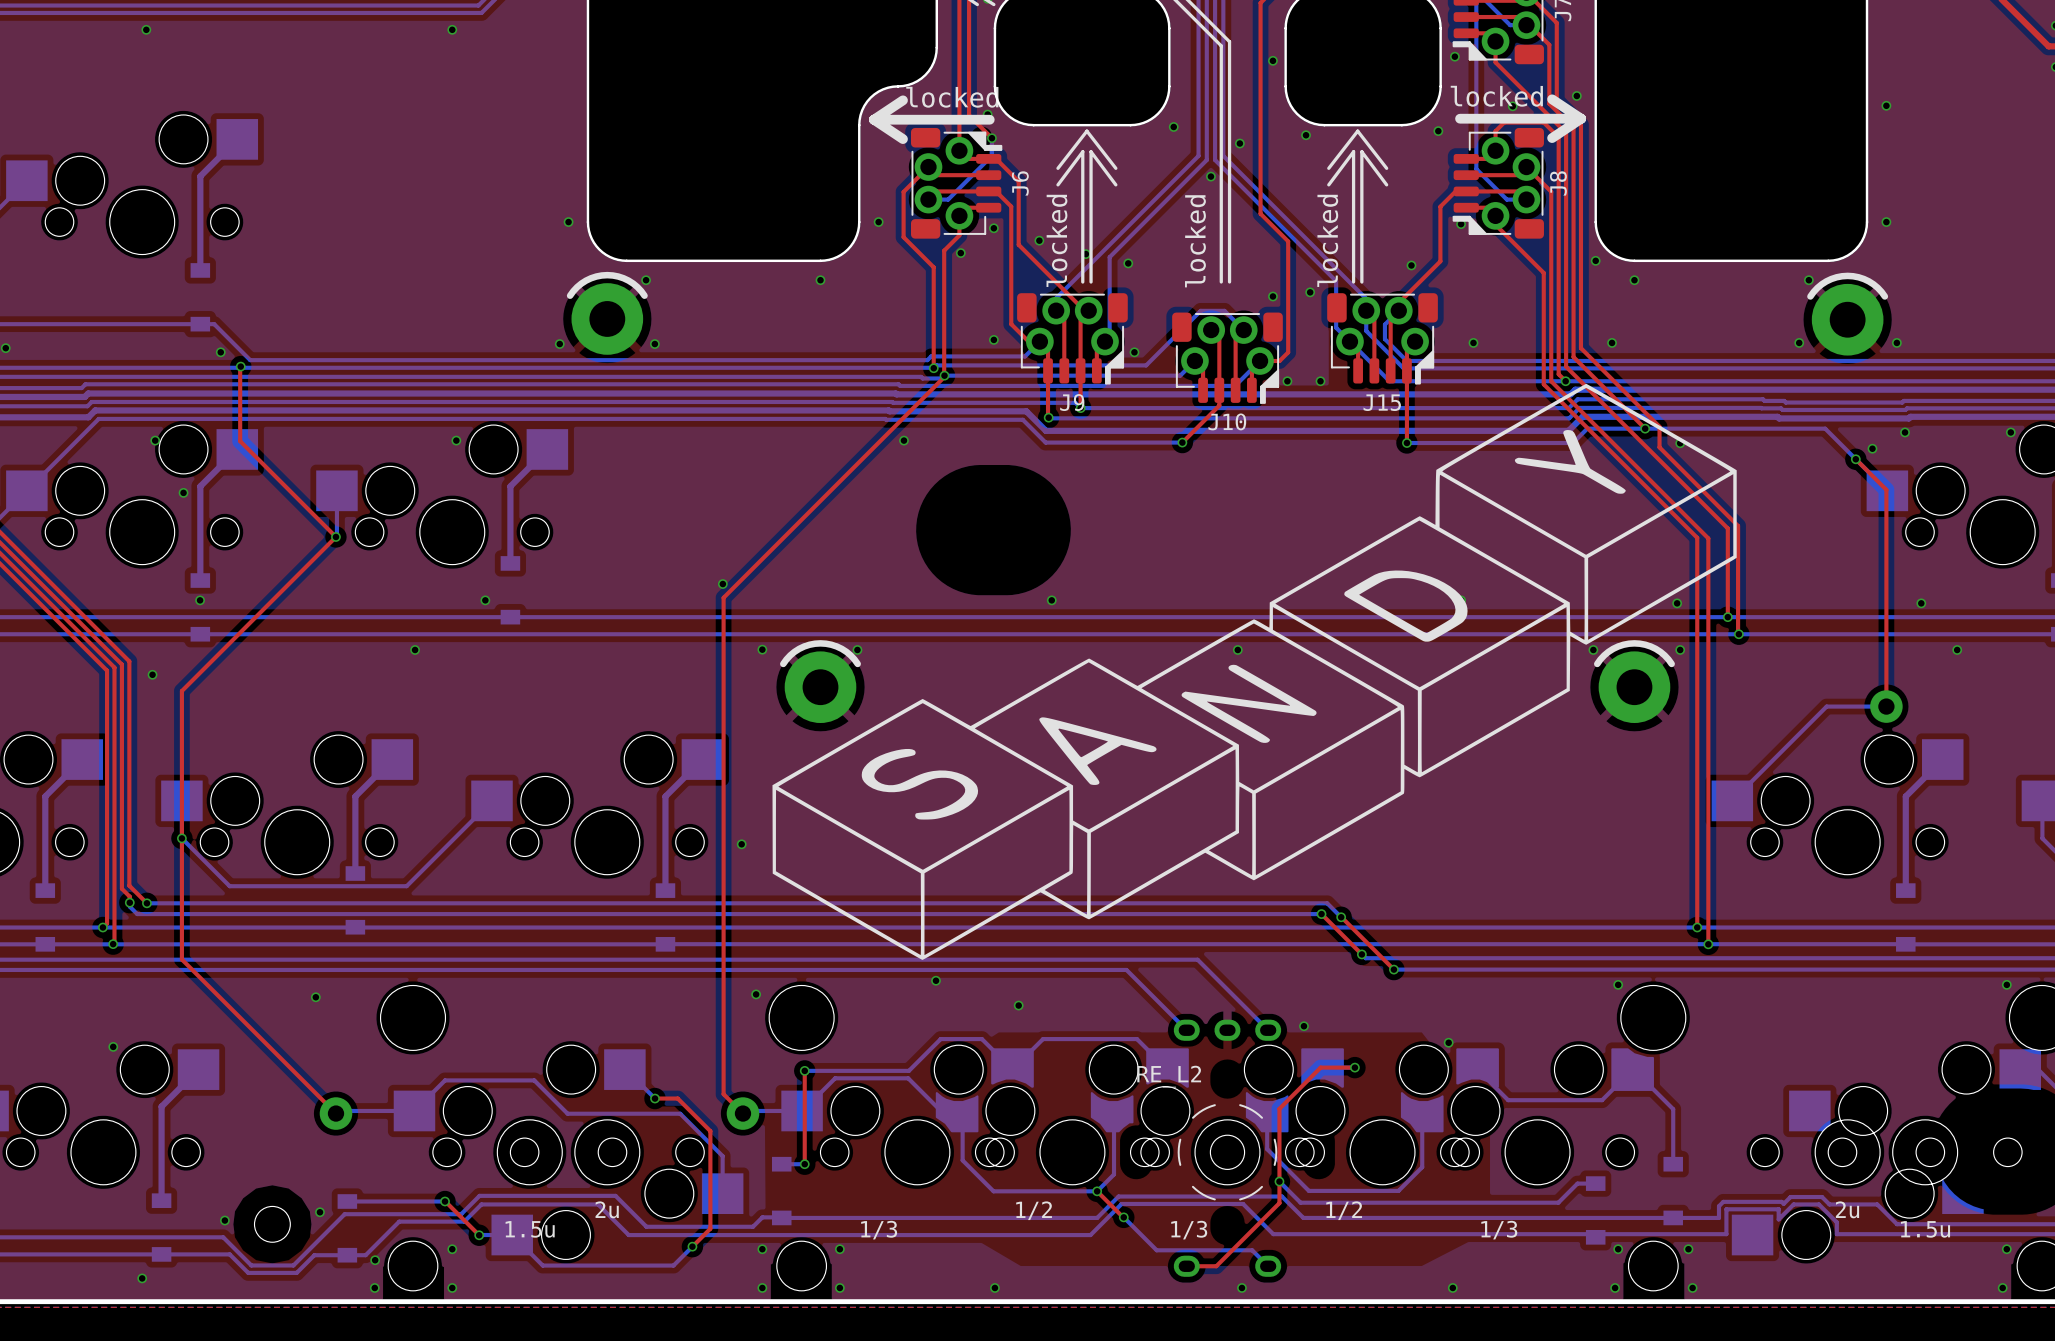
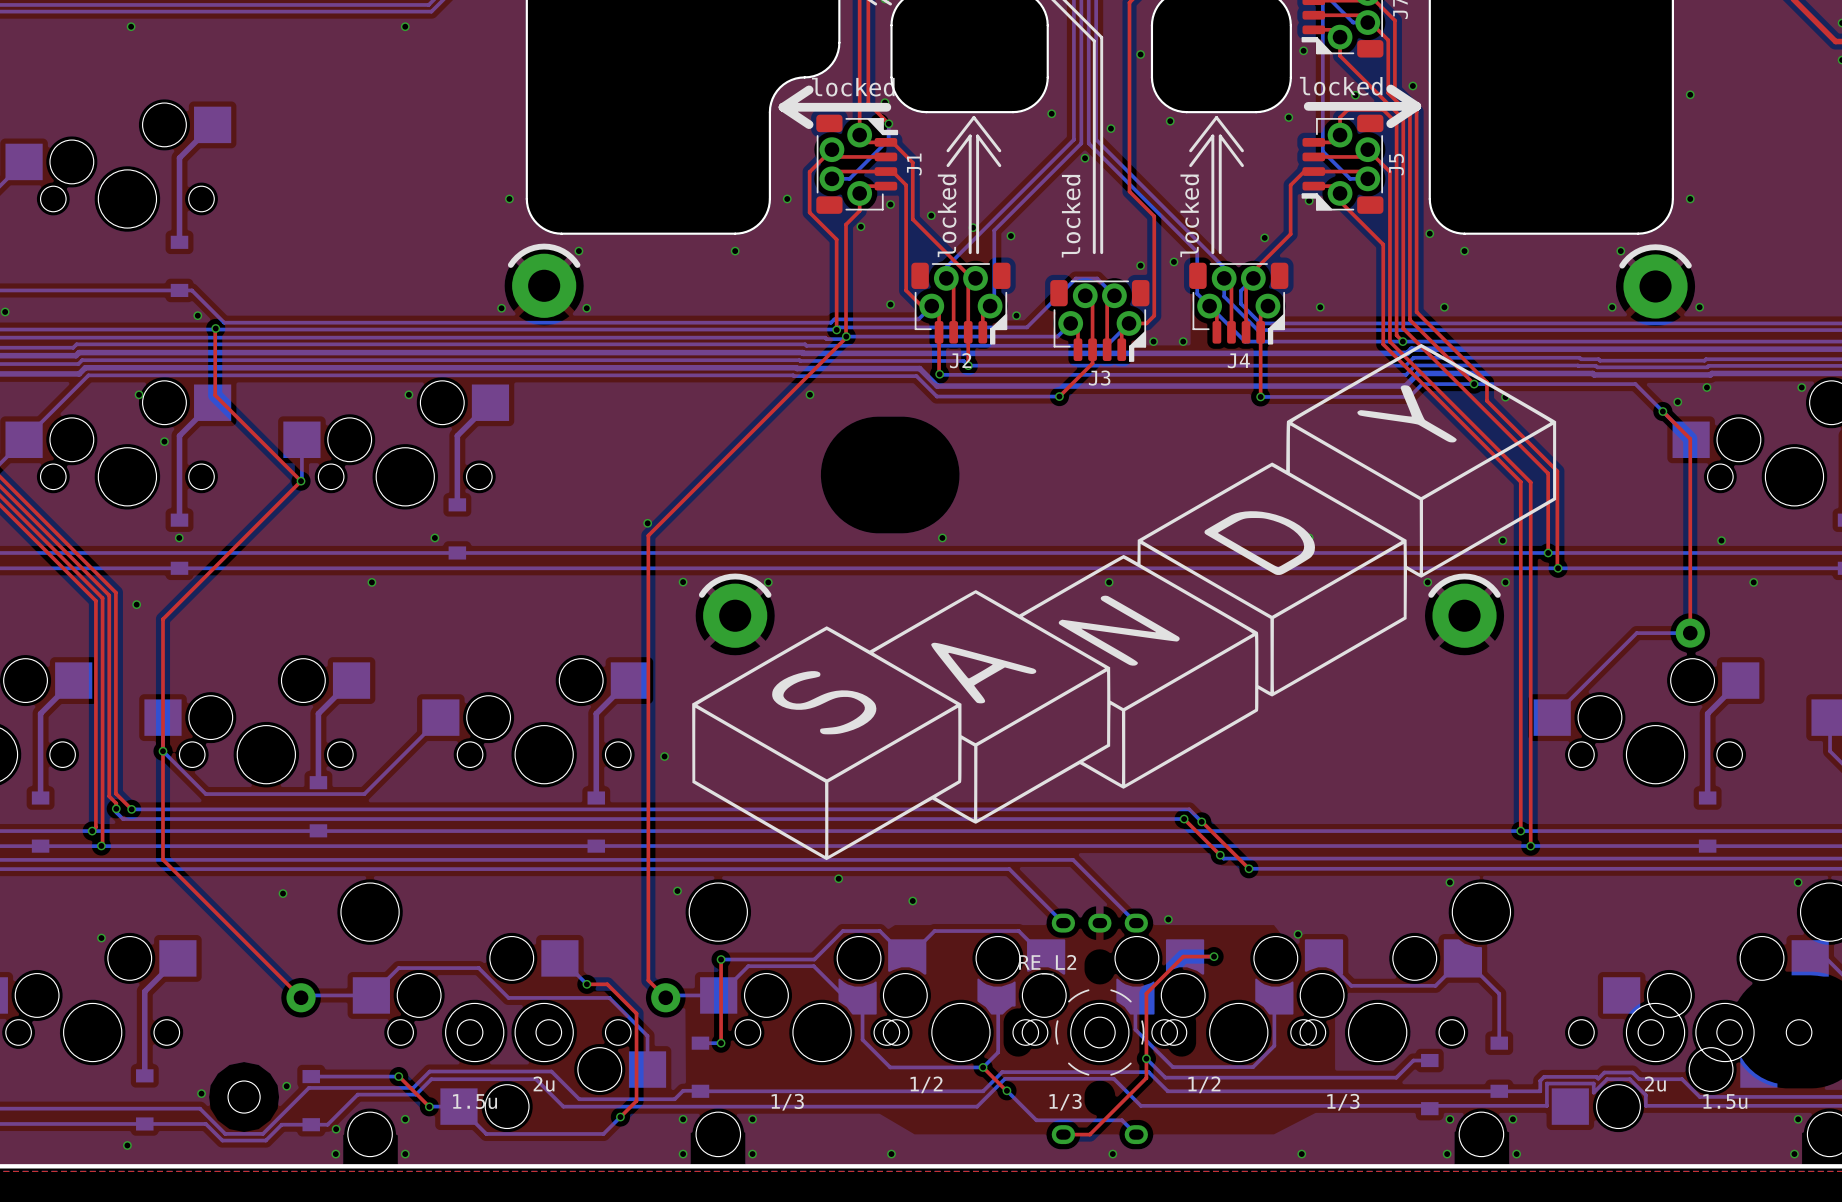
J6 name: J6 (1020, 183) -> J1 (914, 164)
J8 name: J8 (1558, 183) -> J5 (1396, 164)
J9 name: J9 (1072, 402) -> J2 (960, 360)
J15 name: J15 (1382, 402) -> J4 (1238, 360)
J10 name: J10 (1227, 421) -> J3 (1099, 378)

